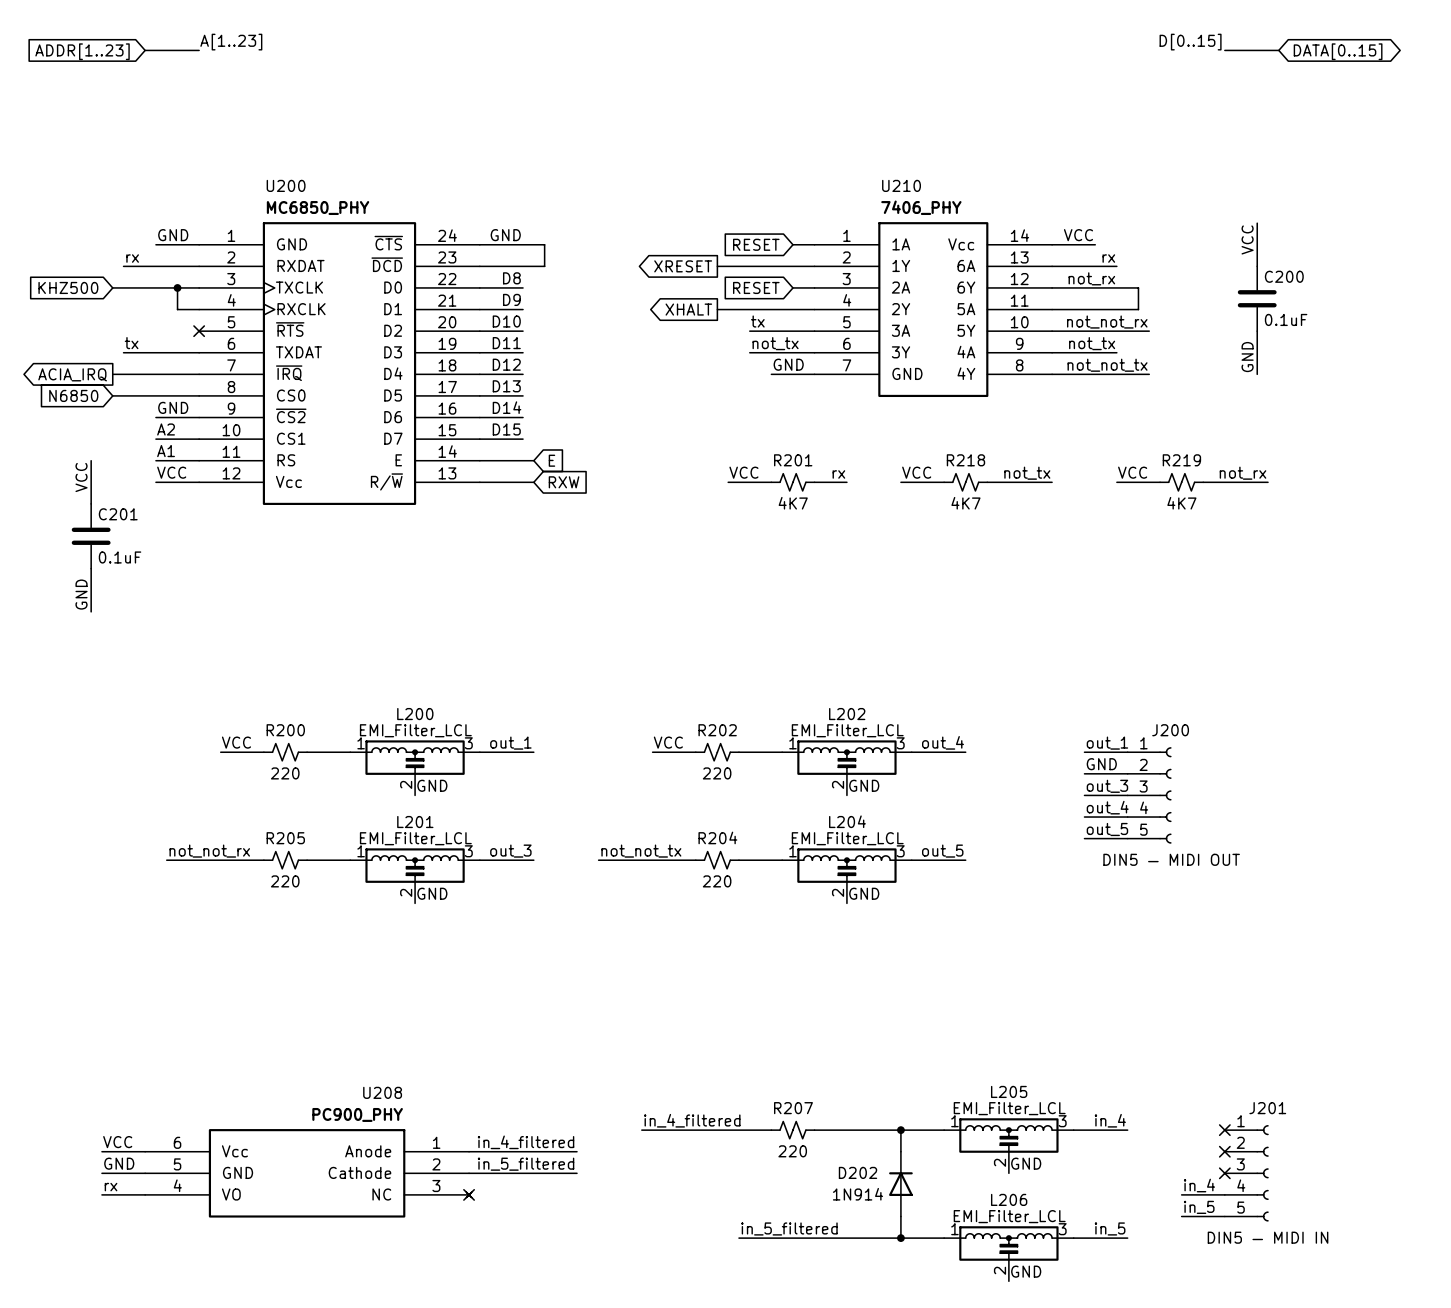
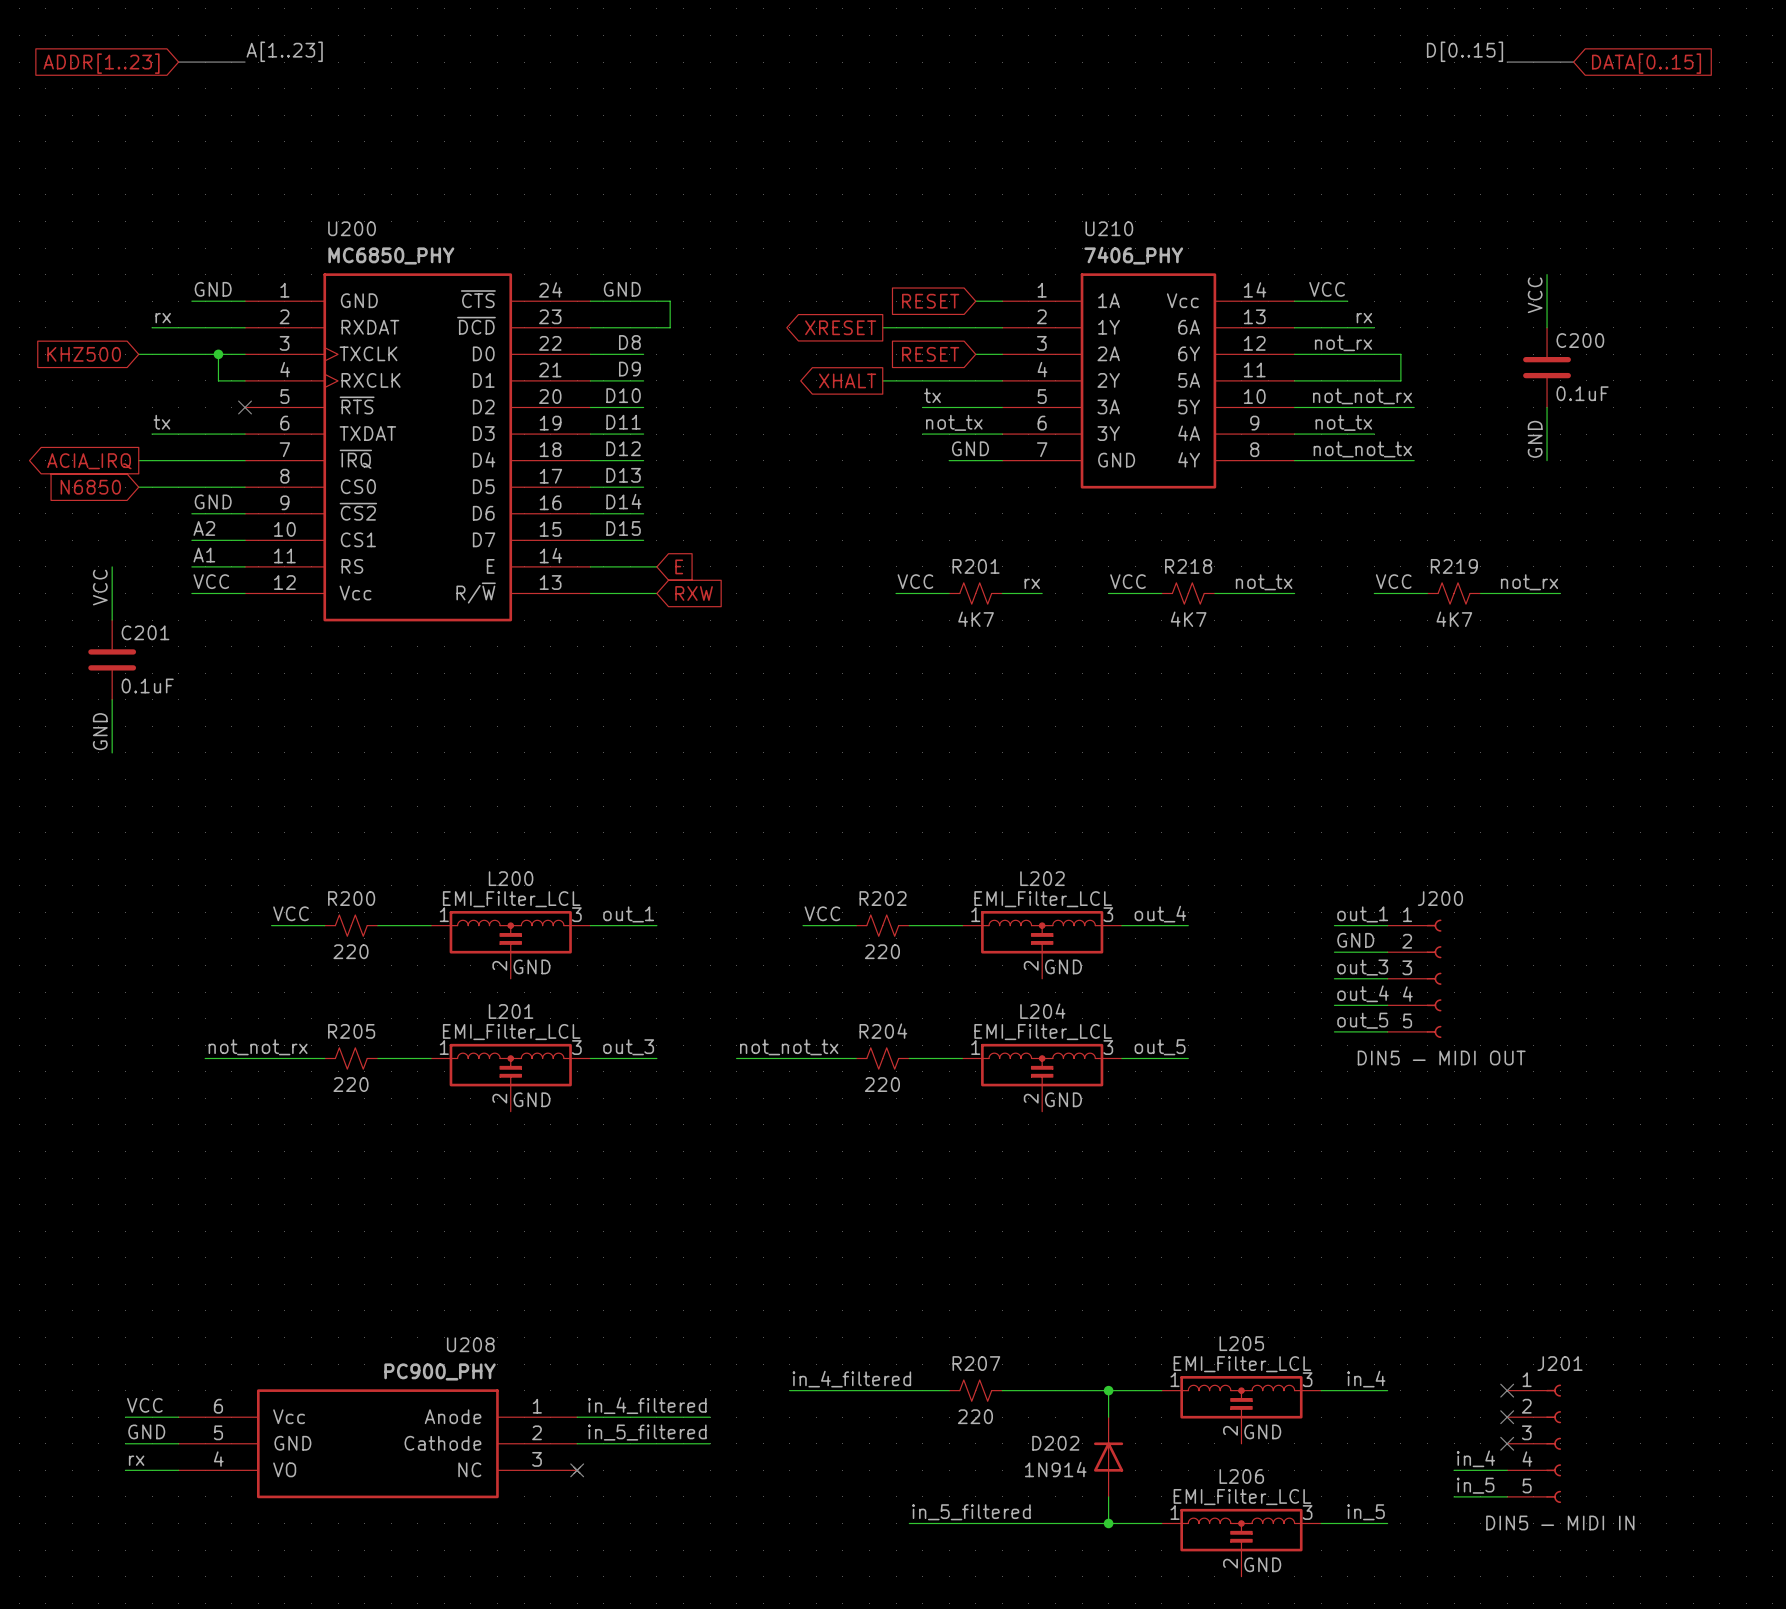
global label shape: bidirectional (1338, 51) -> input (1646, 63)

